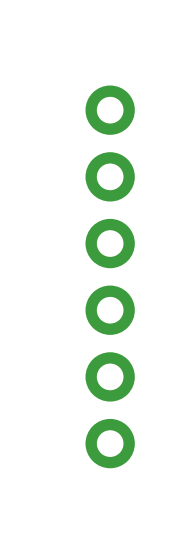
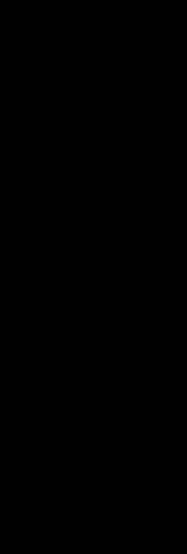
part: (110, 276) -> none

